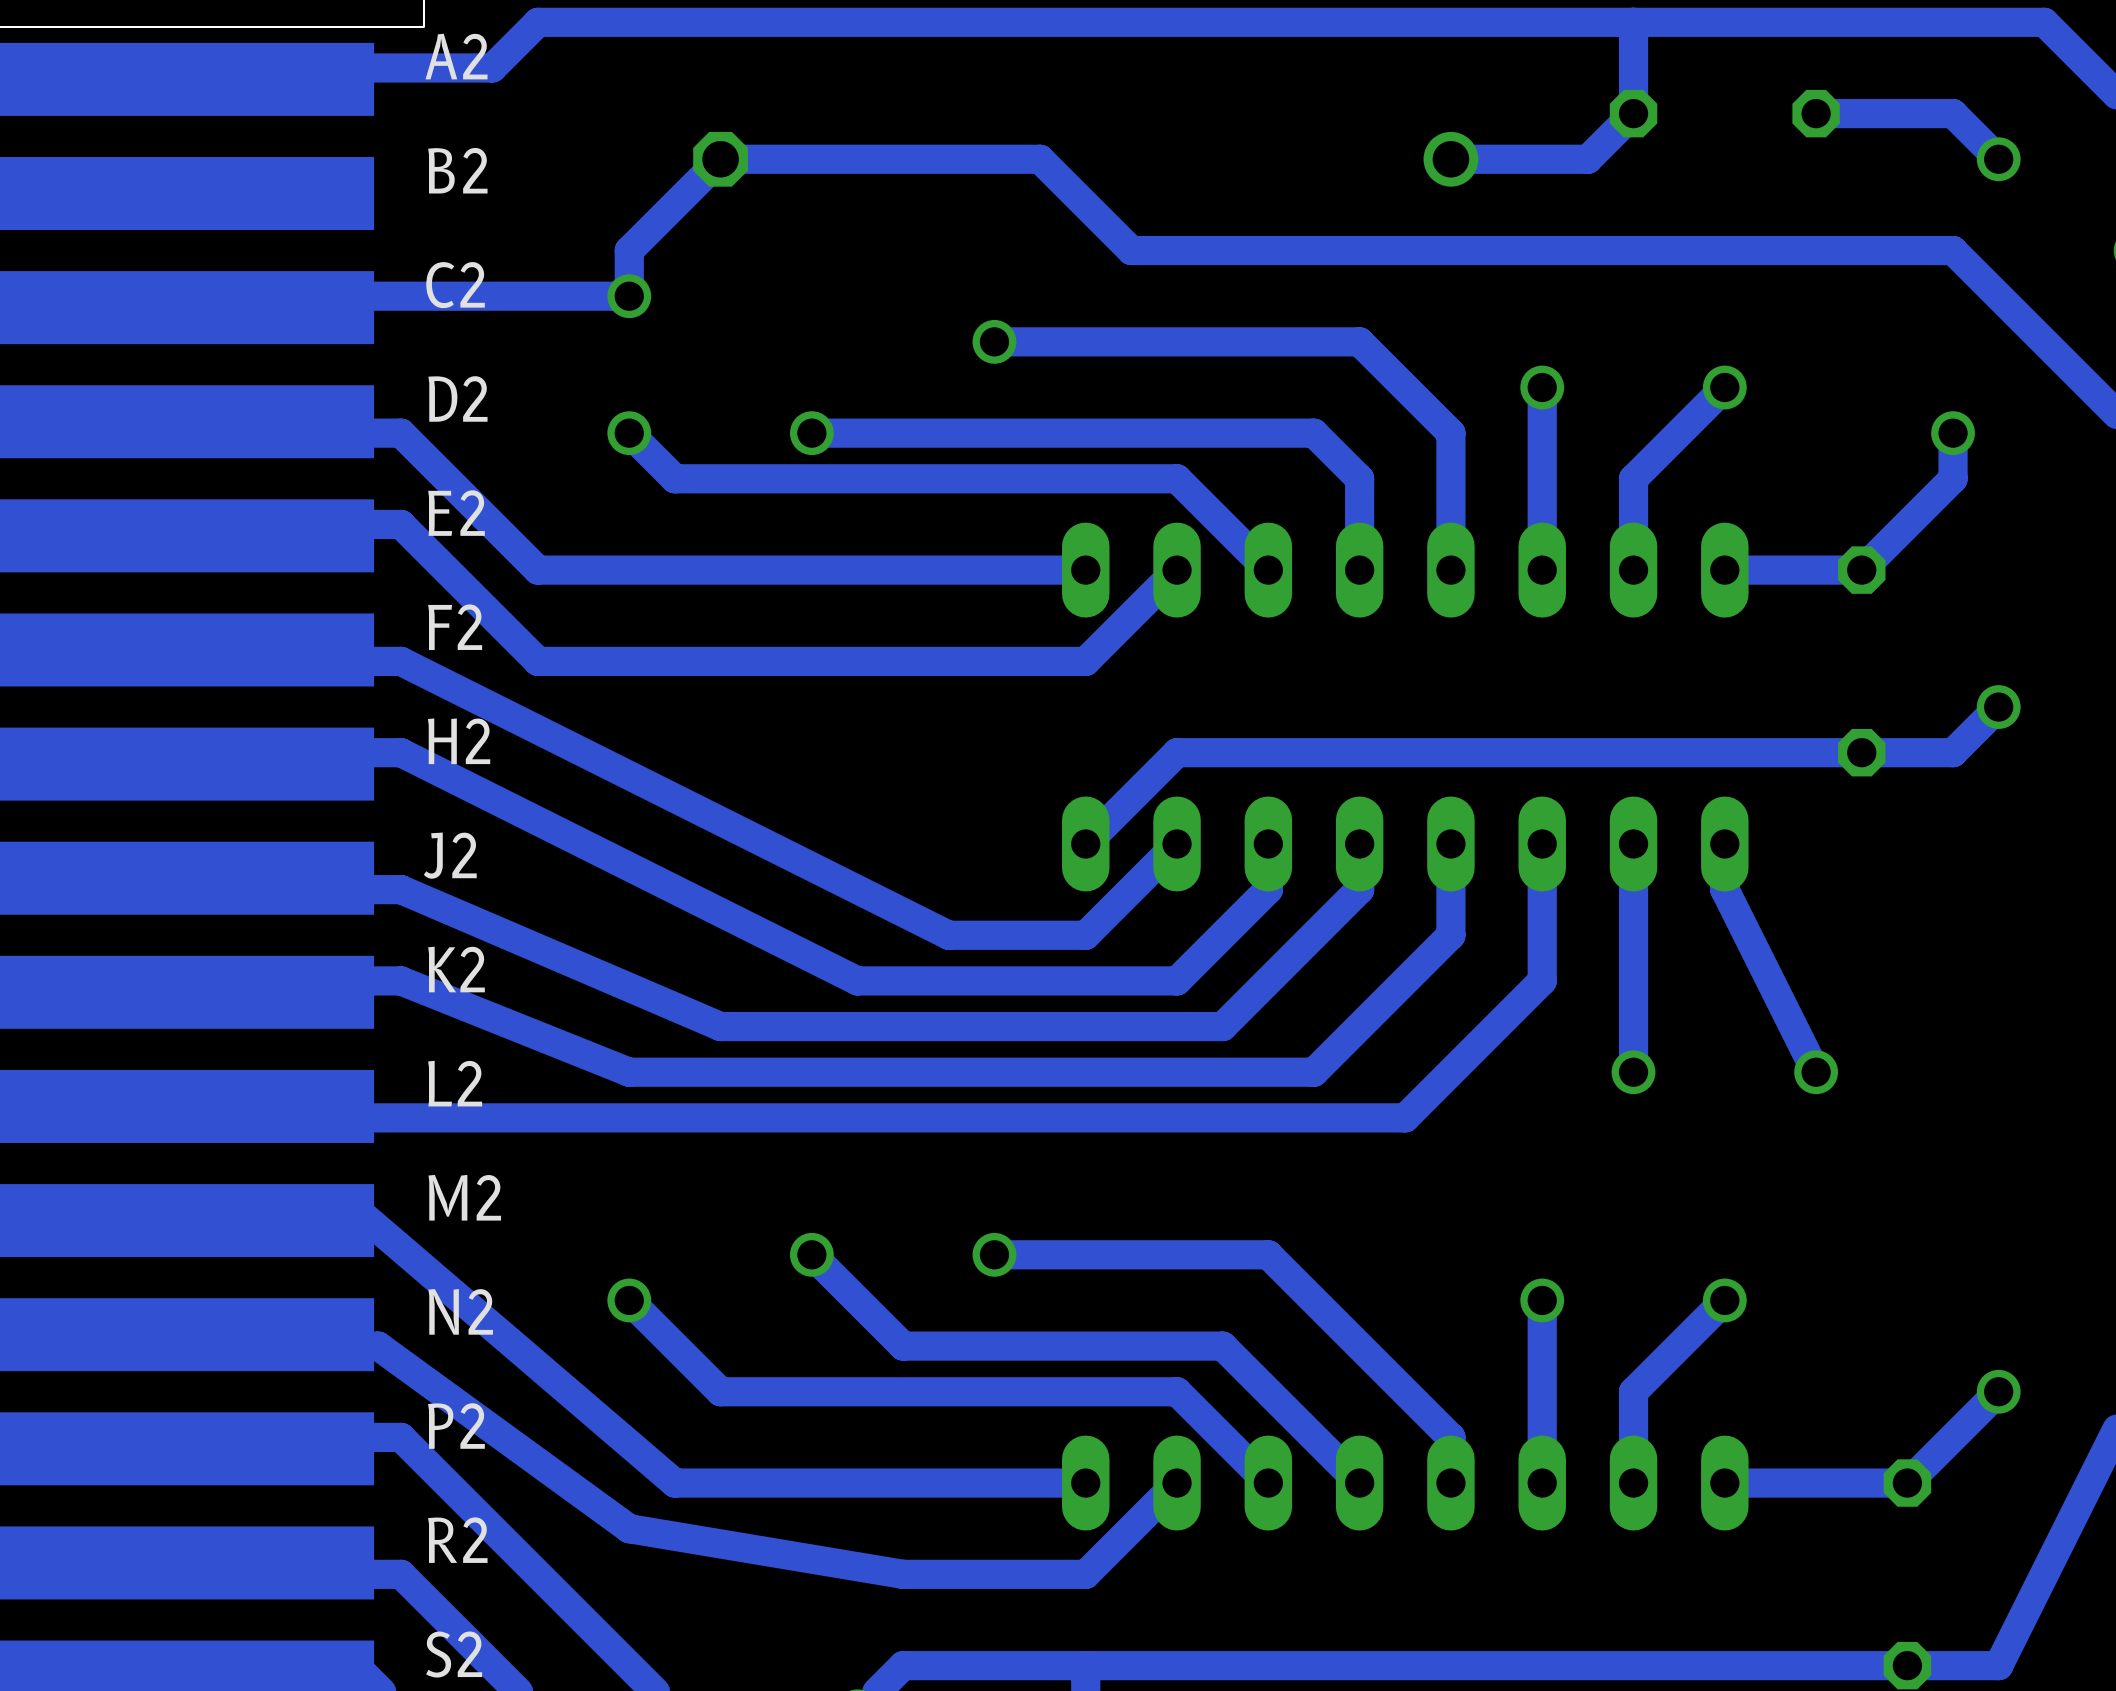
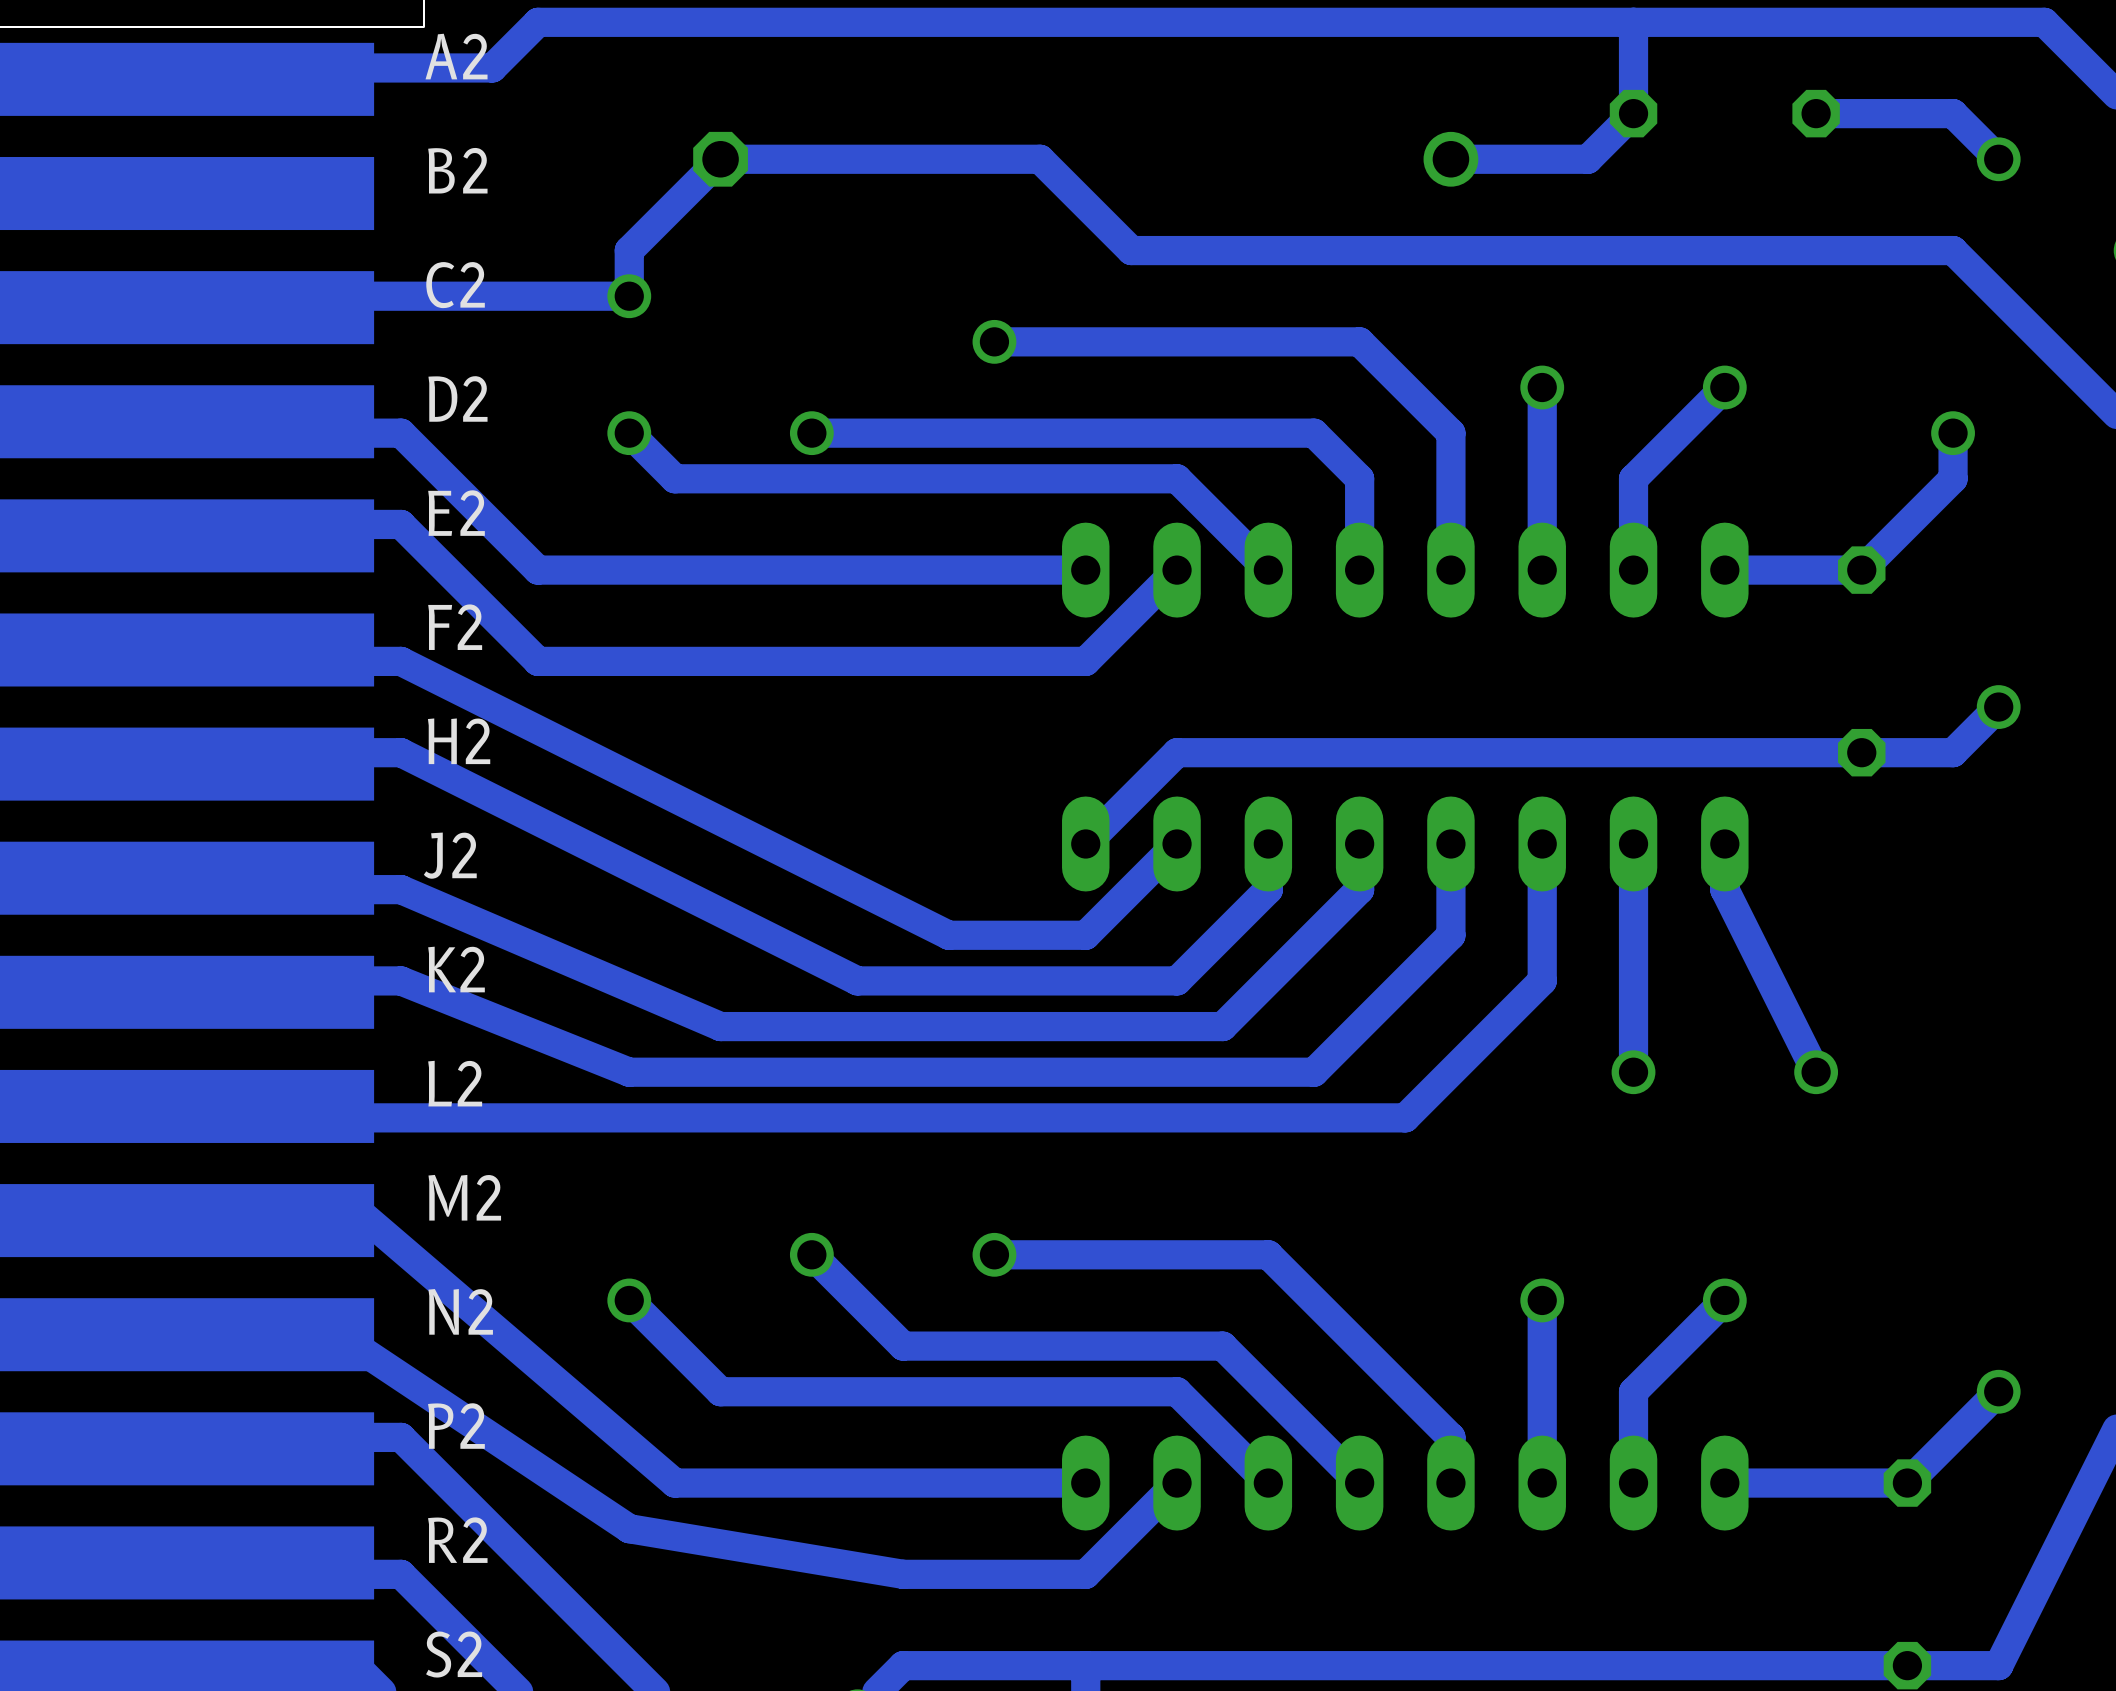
track: (355, 1346) (378, 1346) (629, 1528) -> (355, 1346) (629, 1528)

